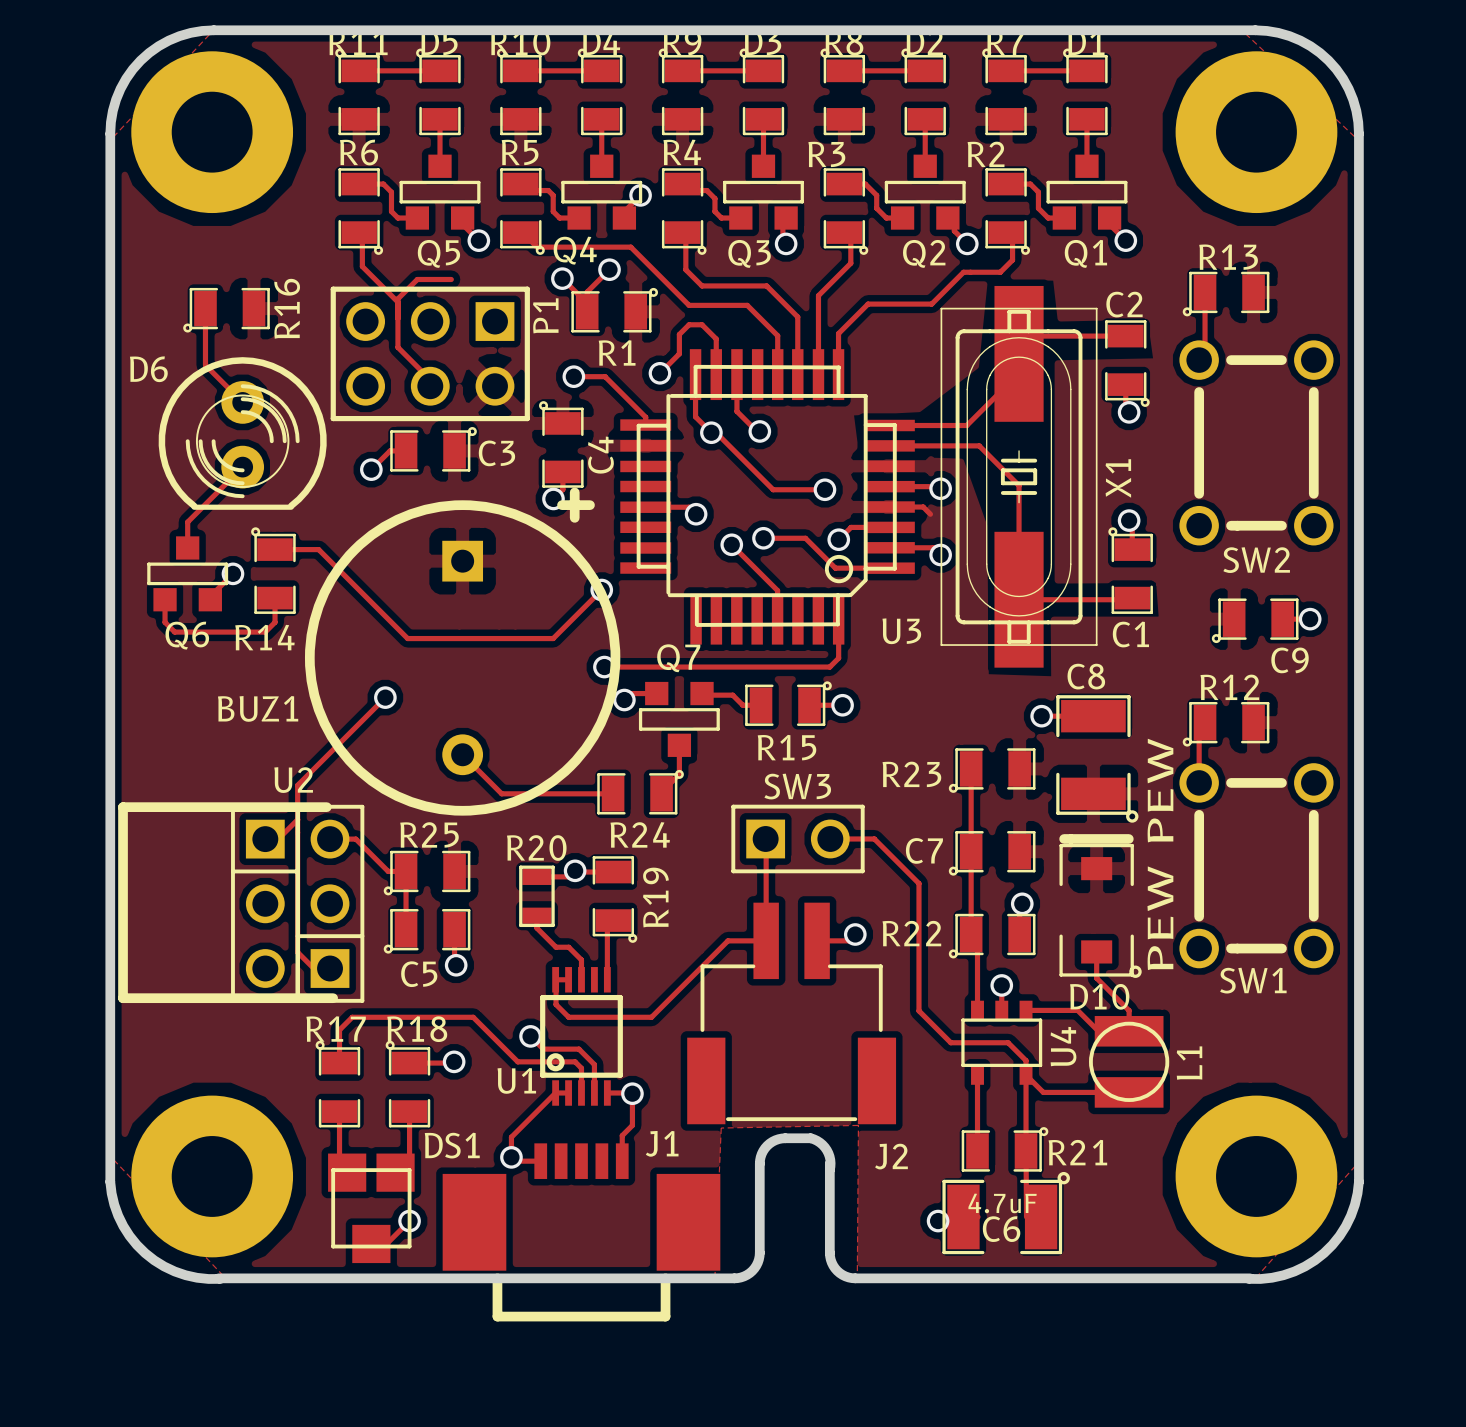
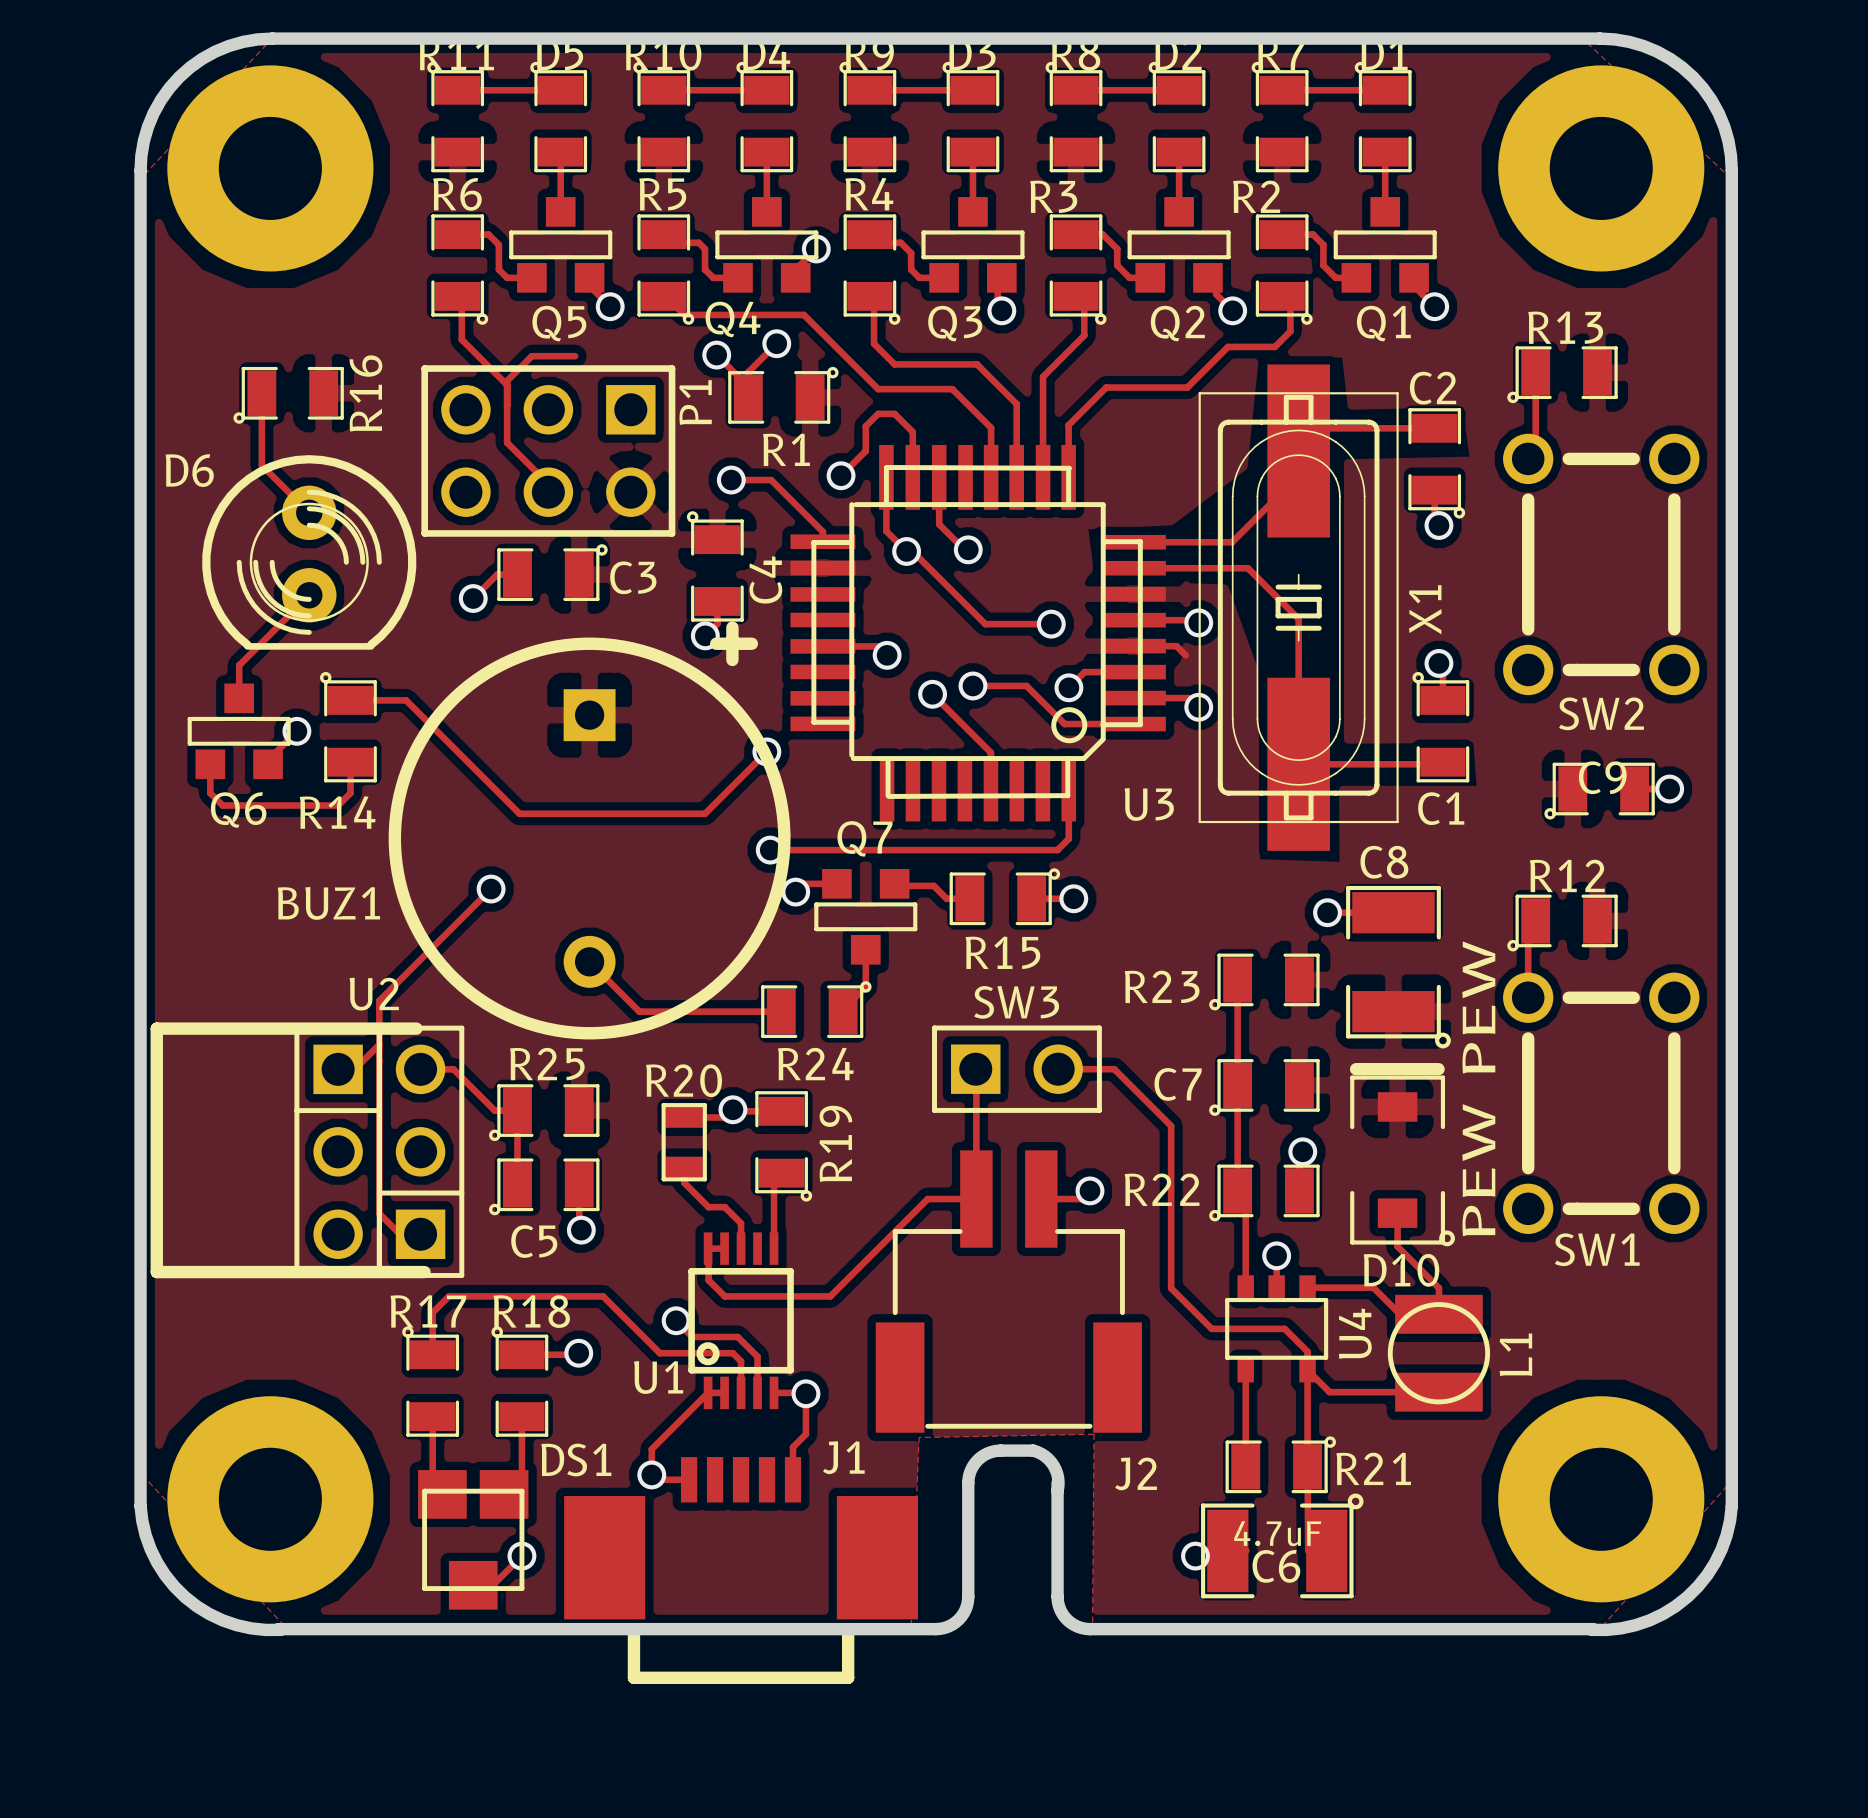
C9 name position: C9 (1290, 660) -> C9 (1602, 777)

